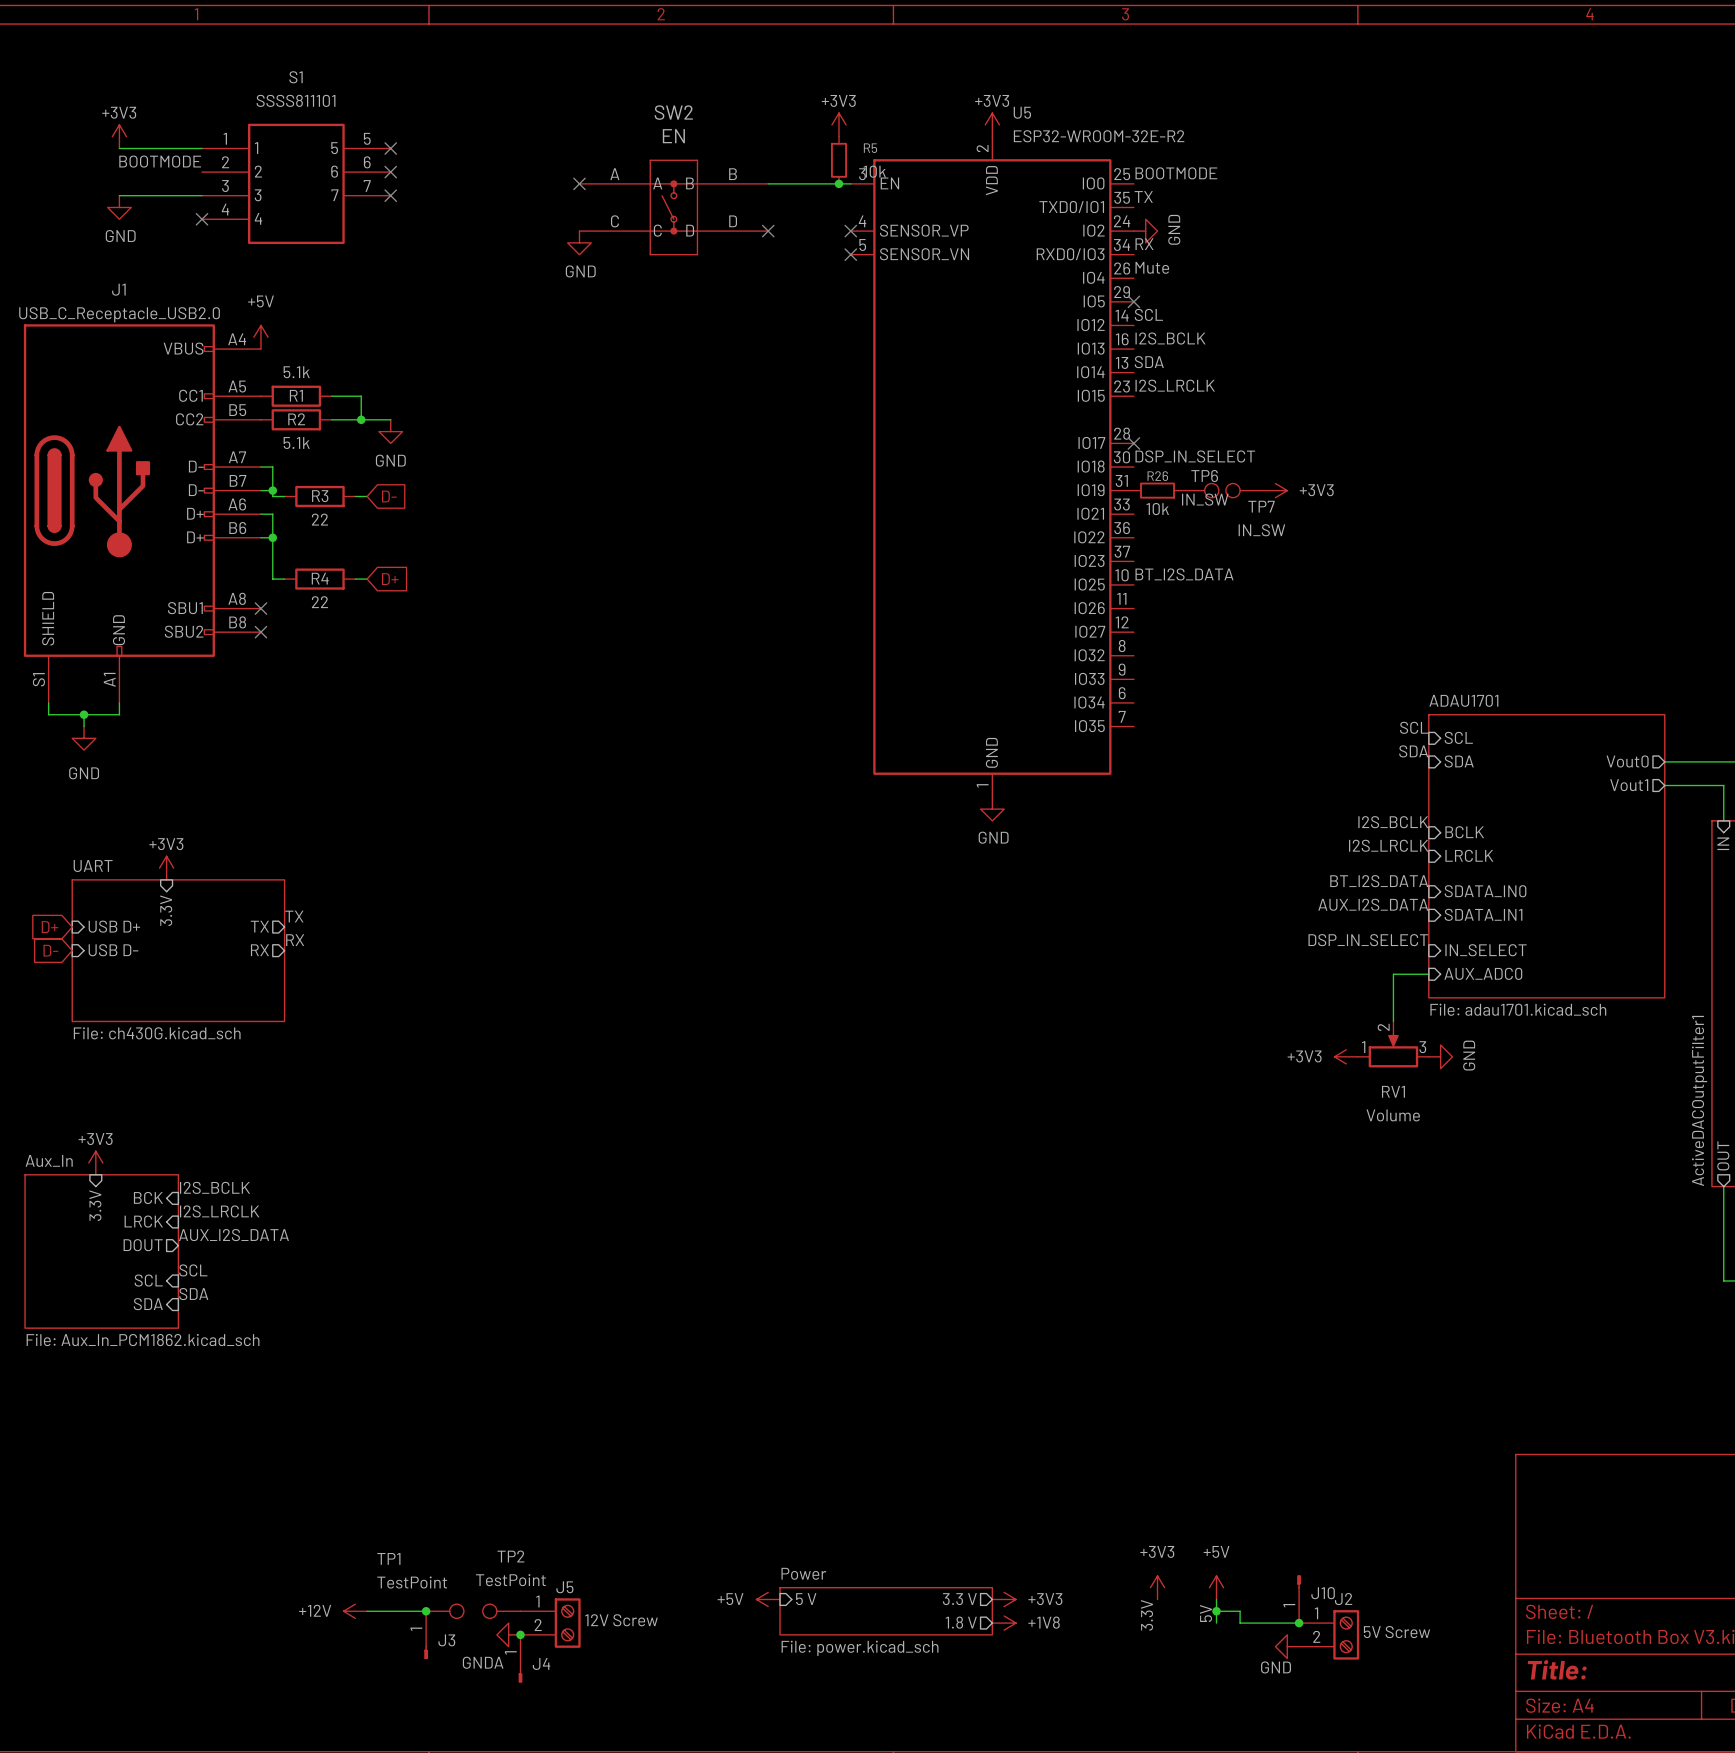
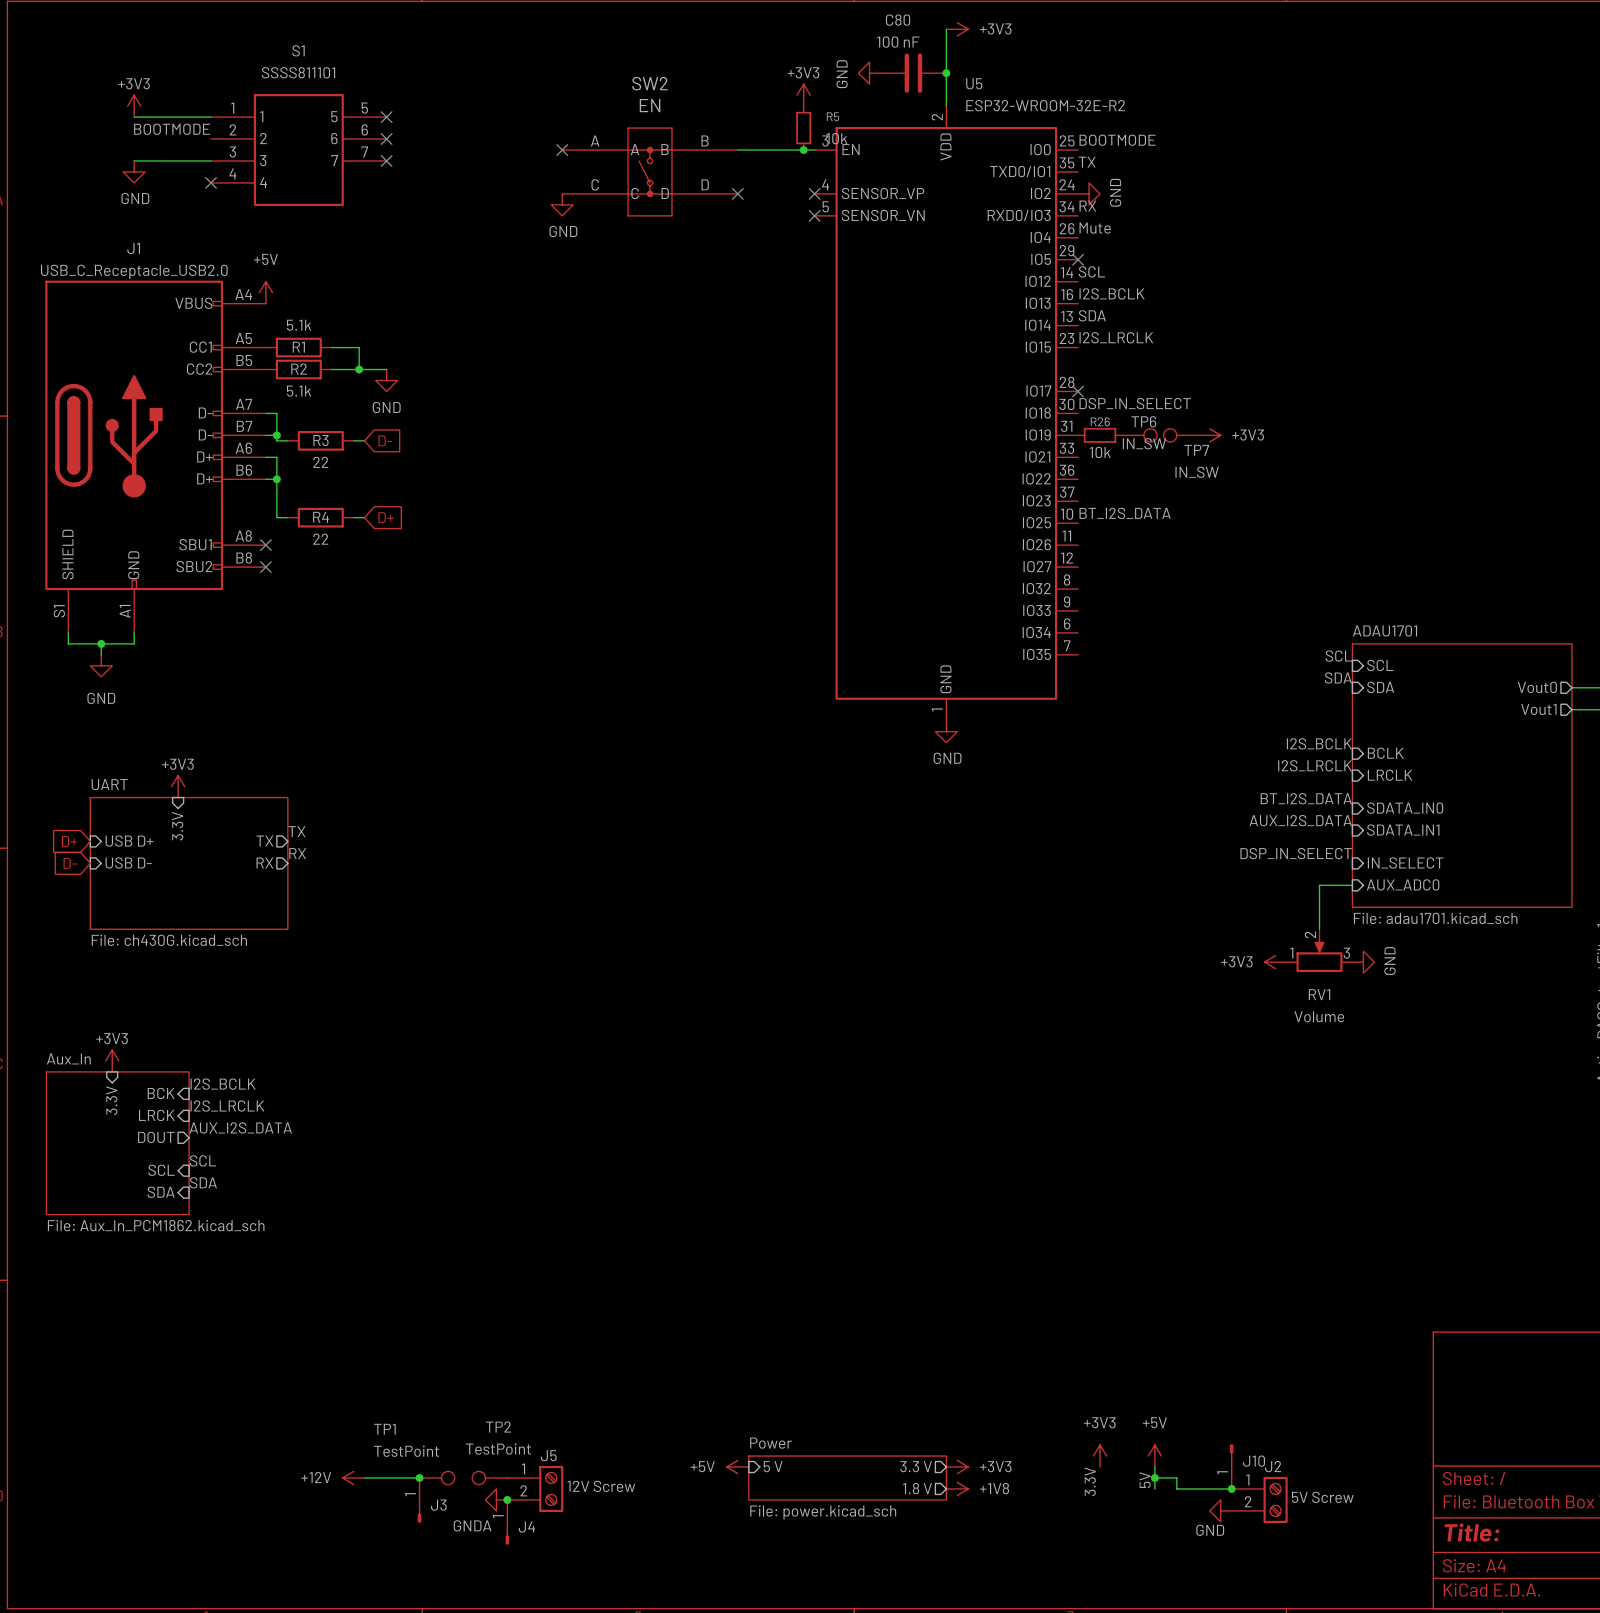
wire: none -> (946, 29) (946, 106)
power symbol text position: +3V3 (992, 100) -> +3V3 (995, 28)
power symbol: none -> GND (869, 73)
C80: none -> 100 nF (913, 73)
junction: none -> (946, 73)
power symbol rotation: 0° (992, 124) -> 90° clockwise (957, 29)
power symbol position: +3V3 (992, 124) -> +3V3 (957, 29)

